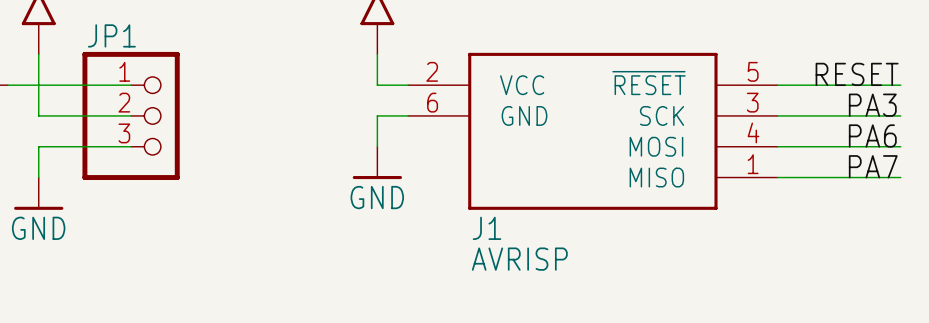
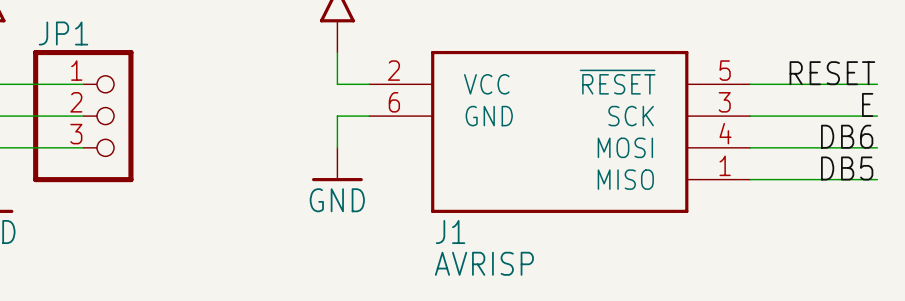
label: PA3 (872, 105) -> E (867, 104)
label: PA6 (872, 135) -> DB6 (847, 136)
label: PA7 (873, 166) -> DB5 (847, 168)

